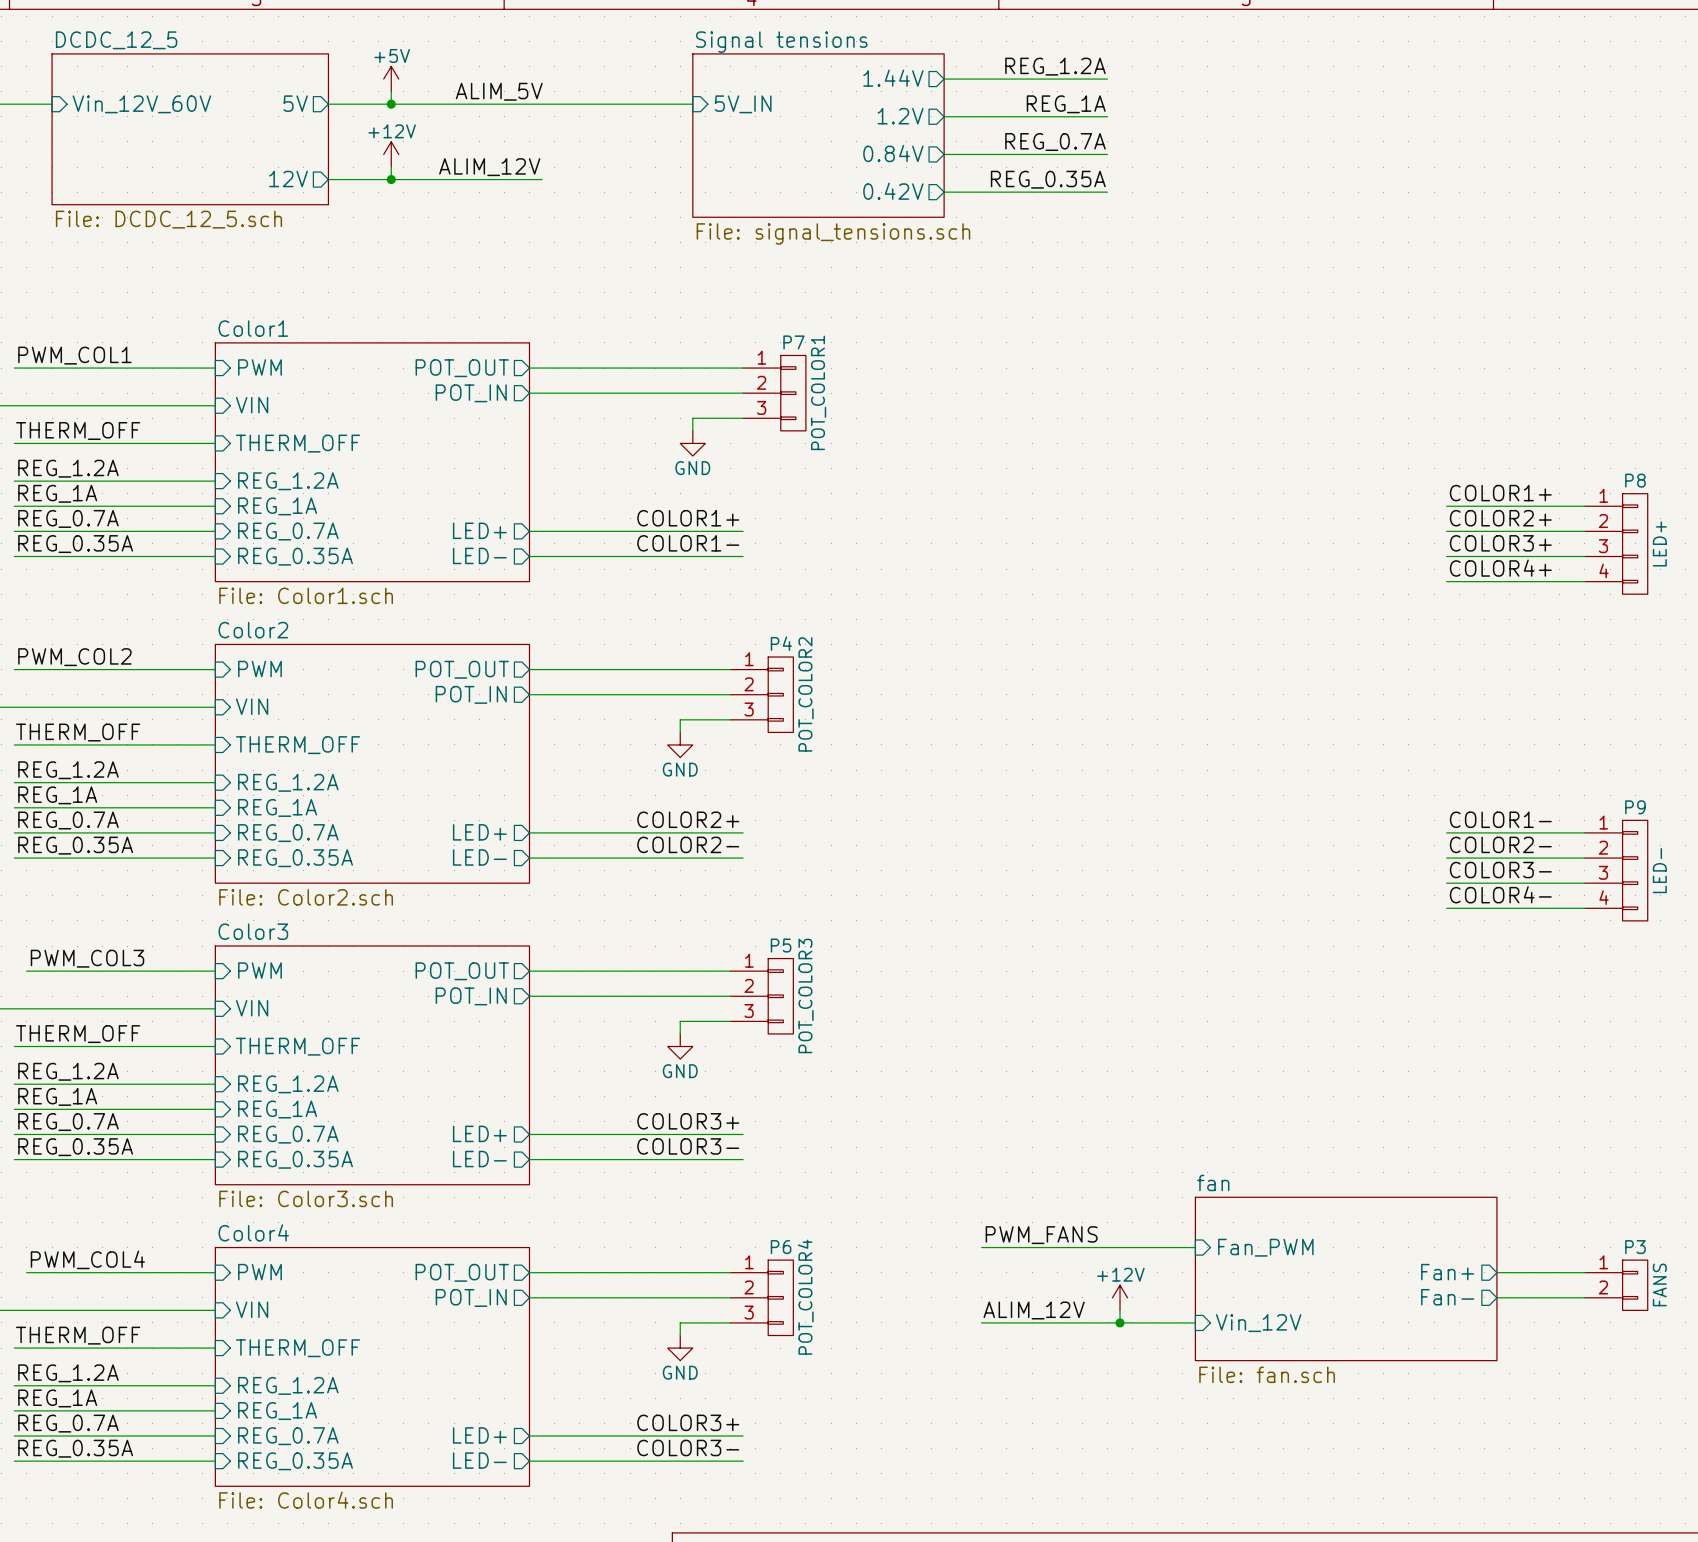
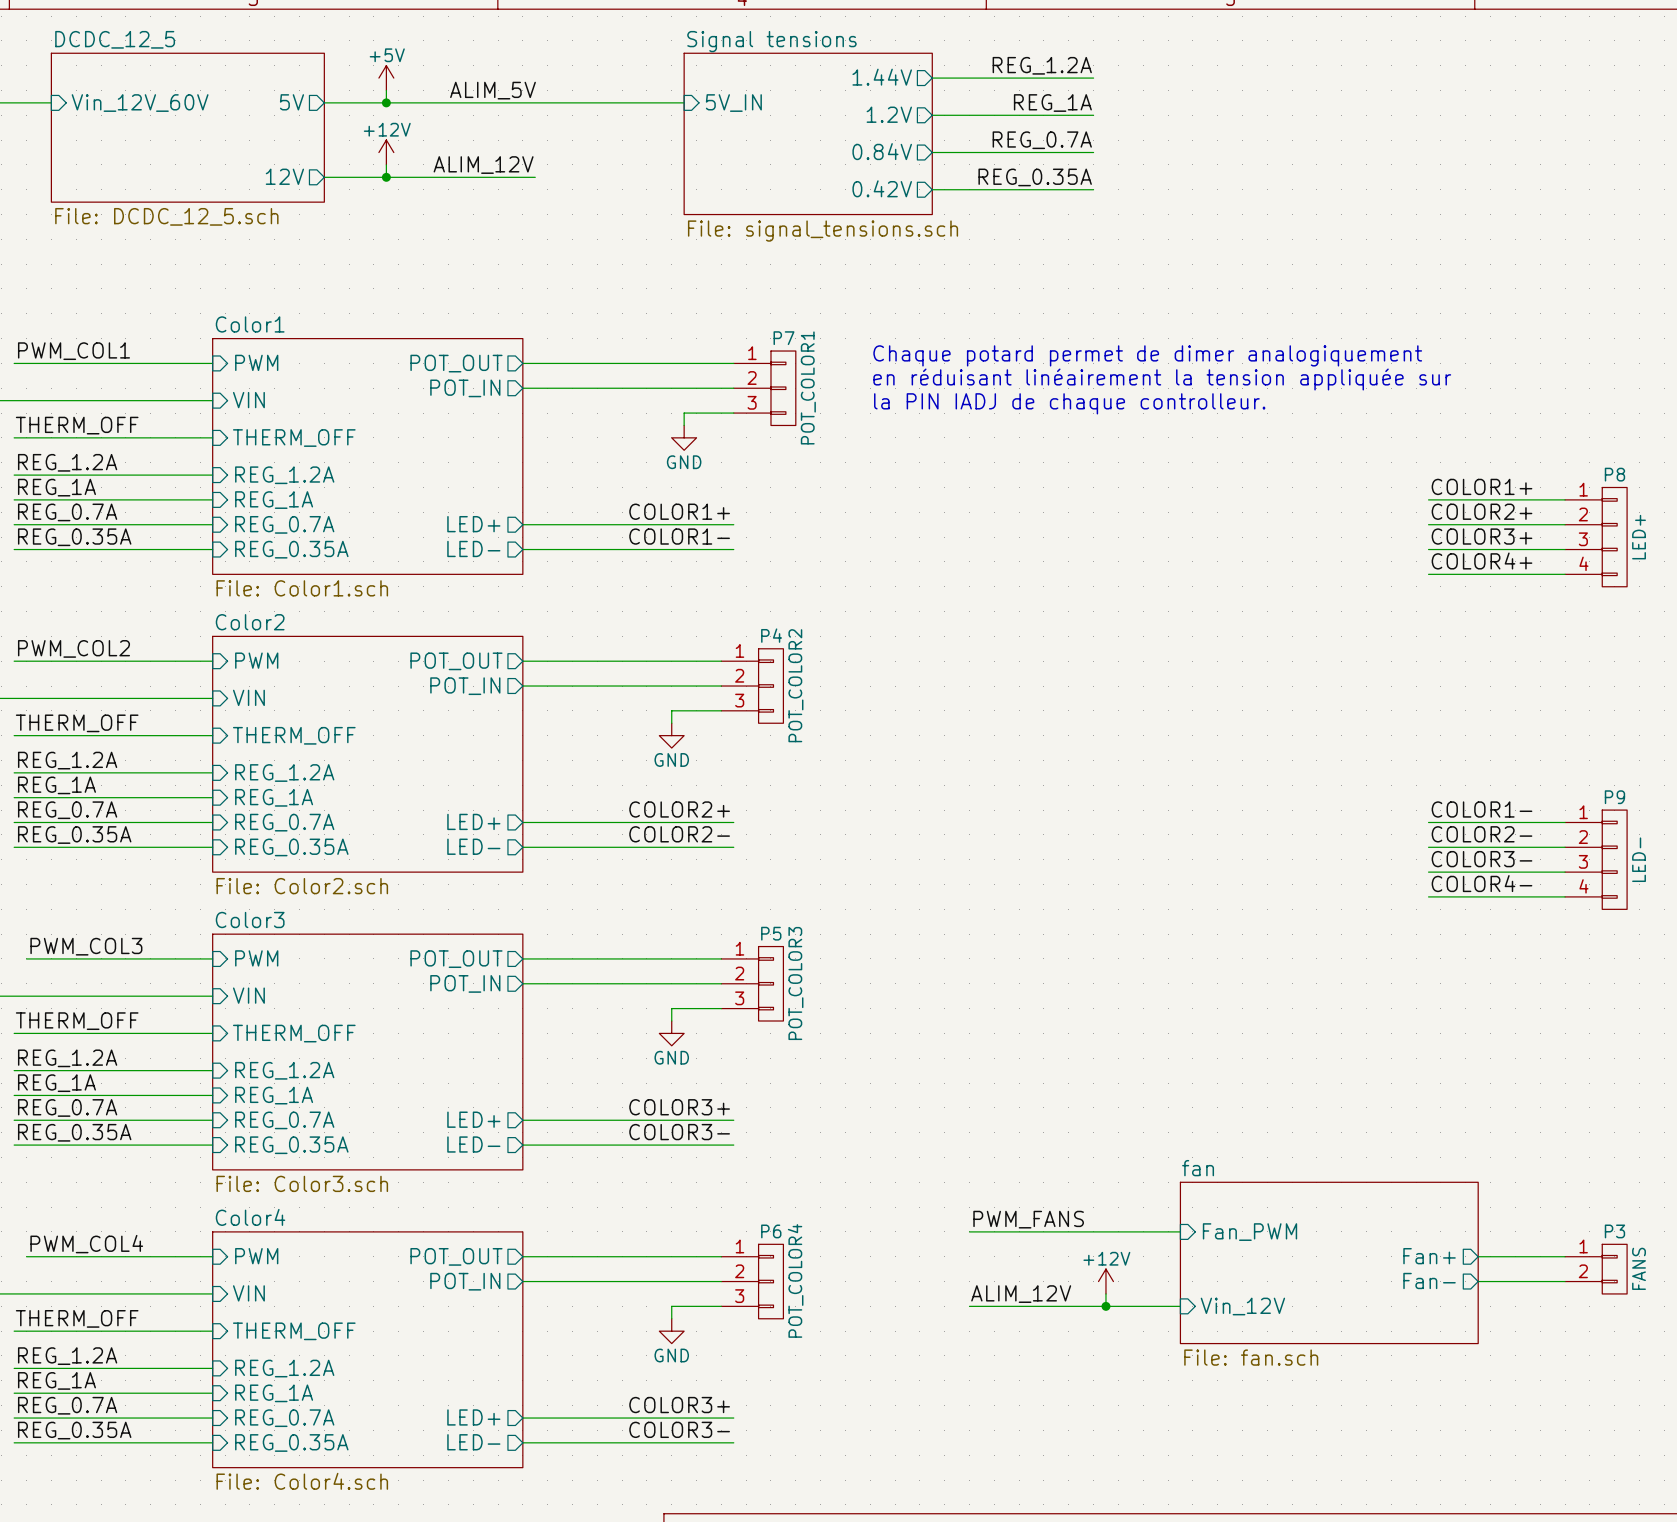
text: none -> Chaque potard permet de dimer analogiquement (1147, 355)
text: none -> en réduisant linéairement la tension appliquée sur (1162, 379)
text: none -> la PIN IADJ de chaque controlleur. (1069, 403)

